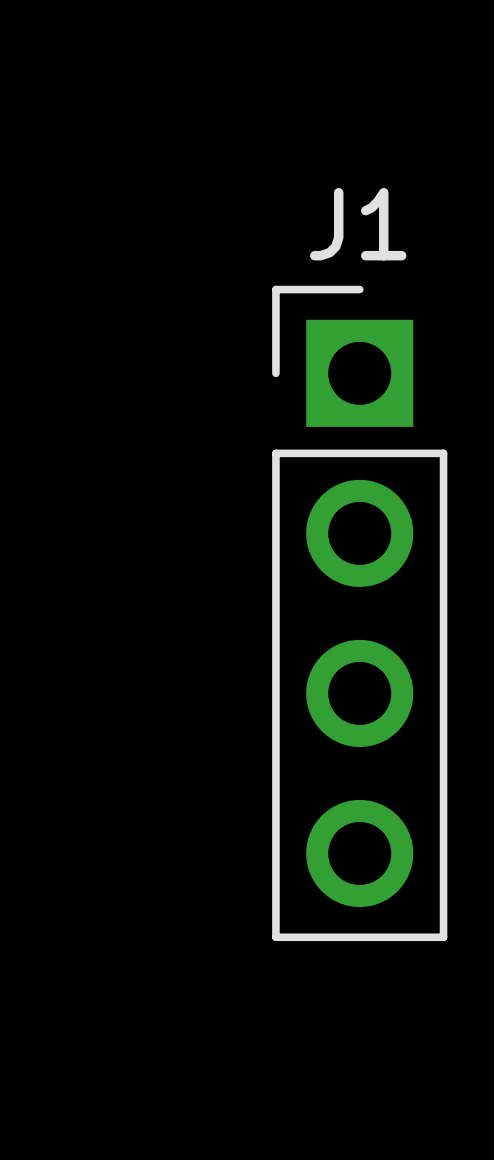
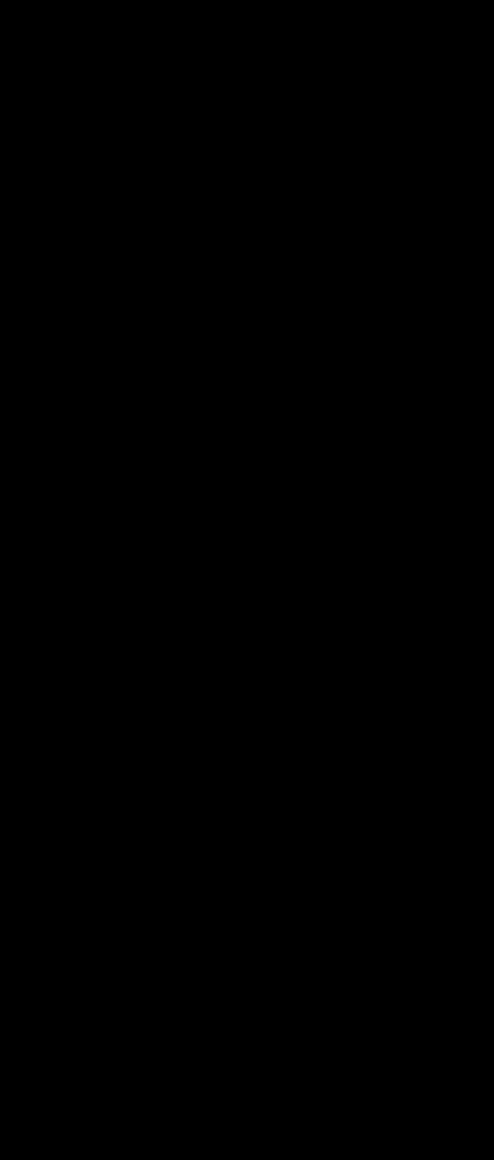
J1: (359, 613) -> none

